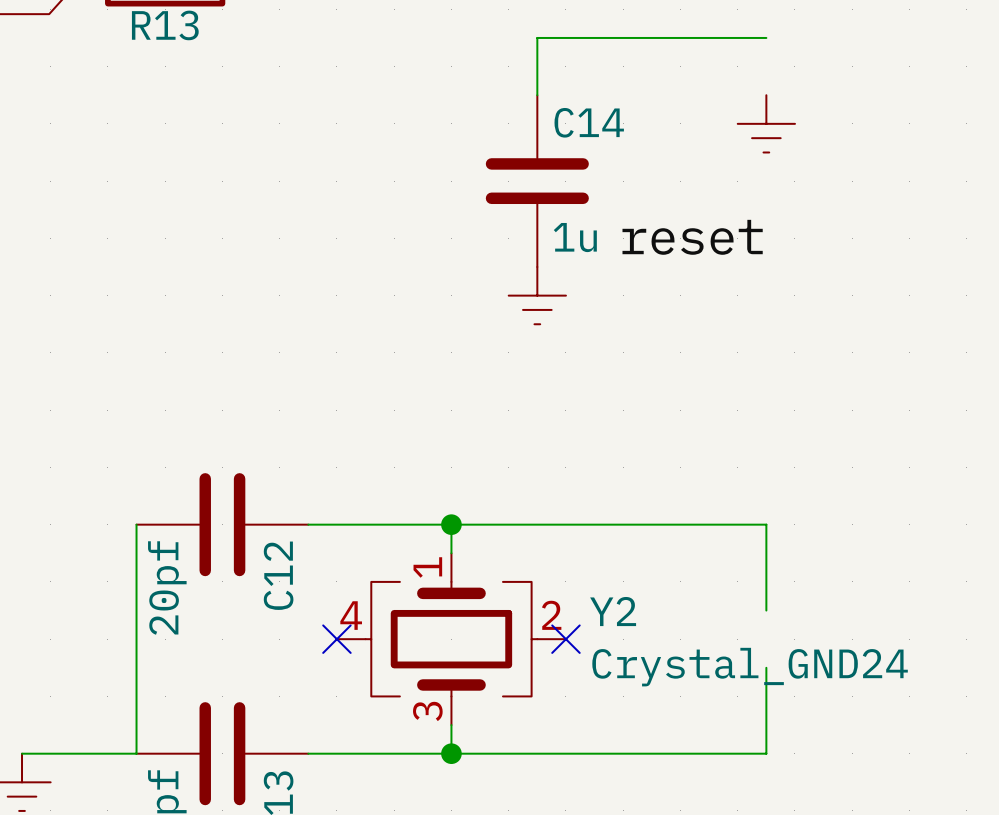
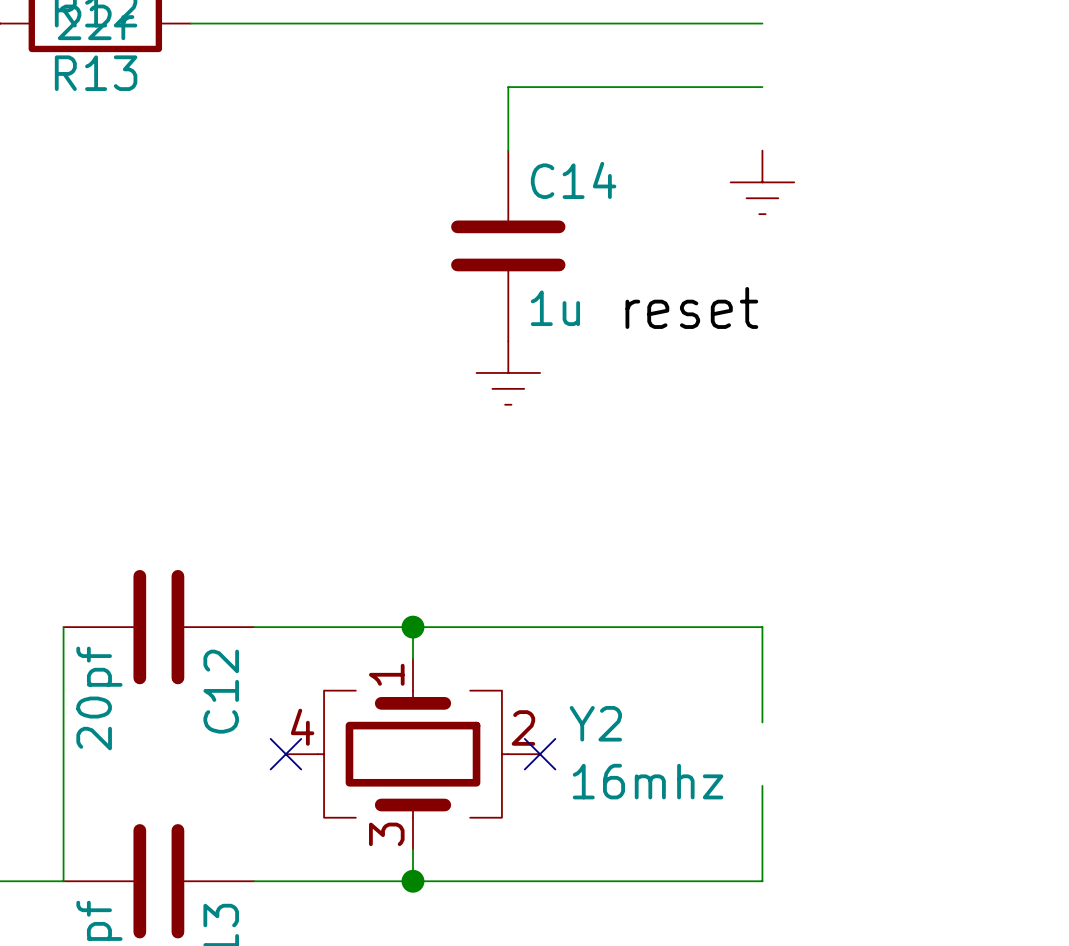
Y2 value: Crystal_GND24 (750, 667) -> 16mhz (648, 781)

